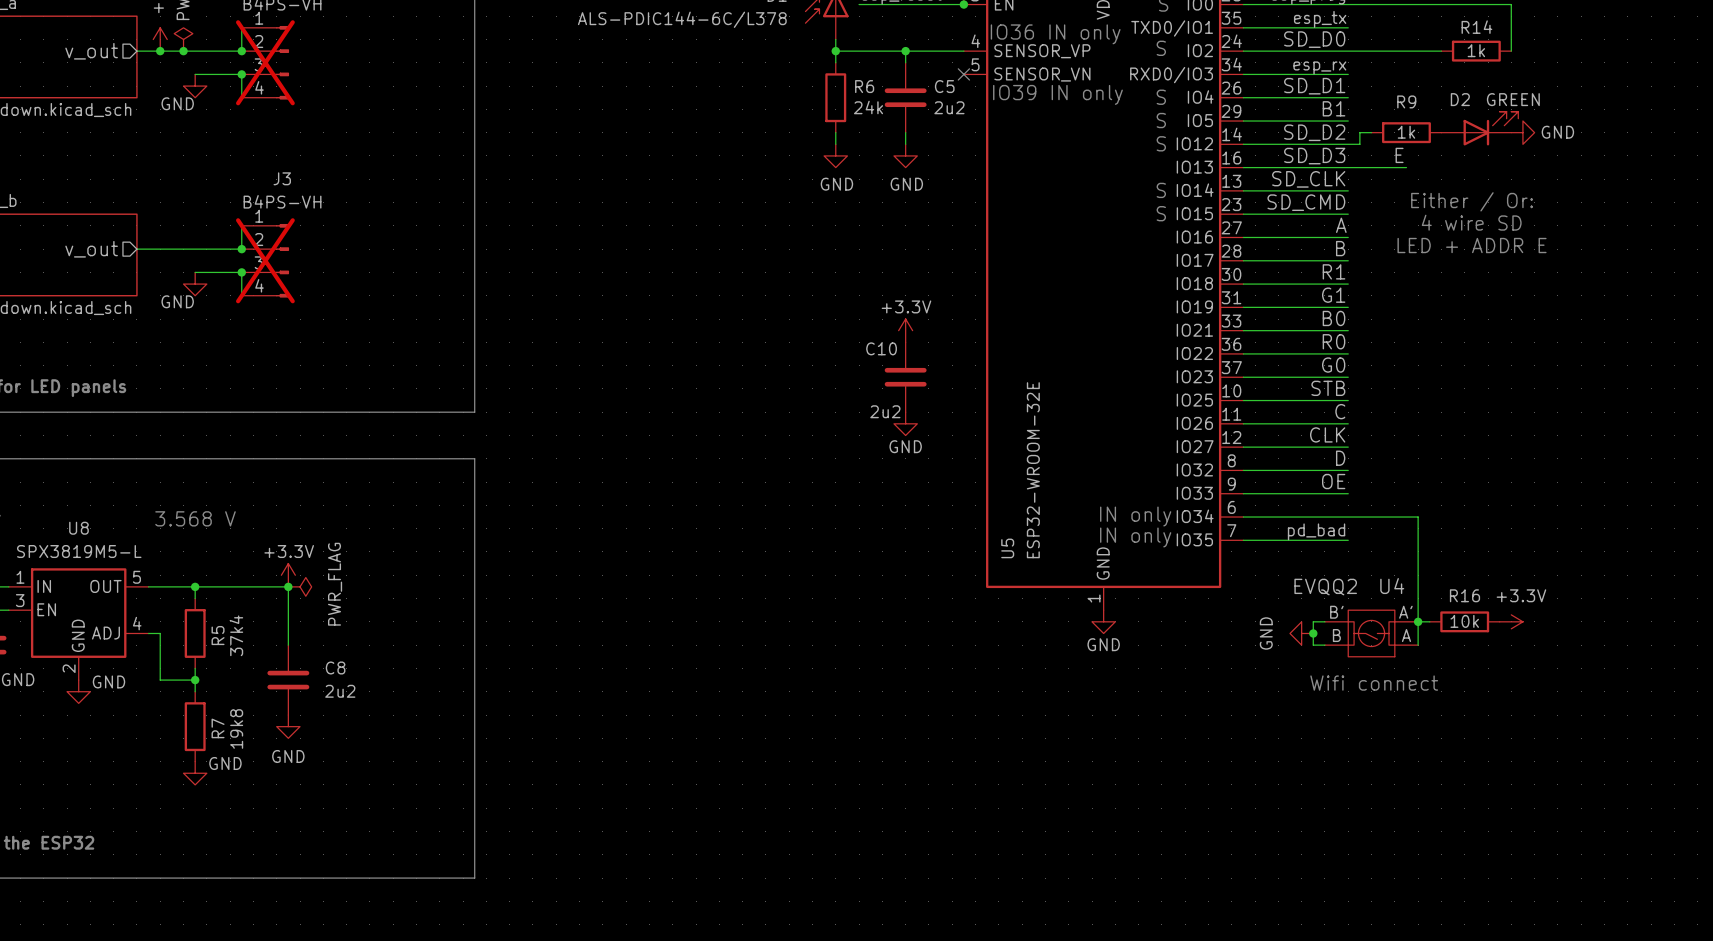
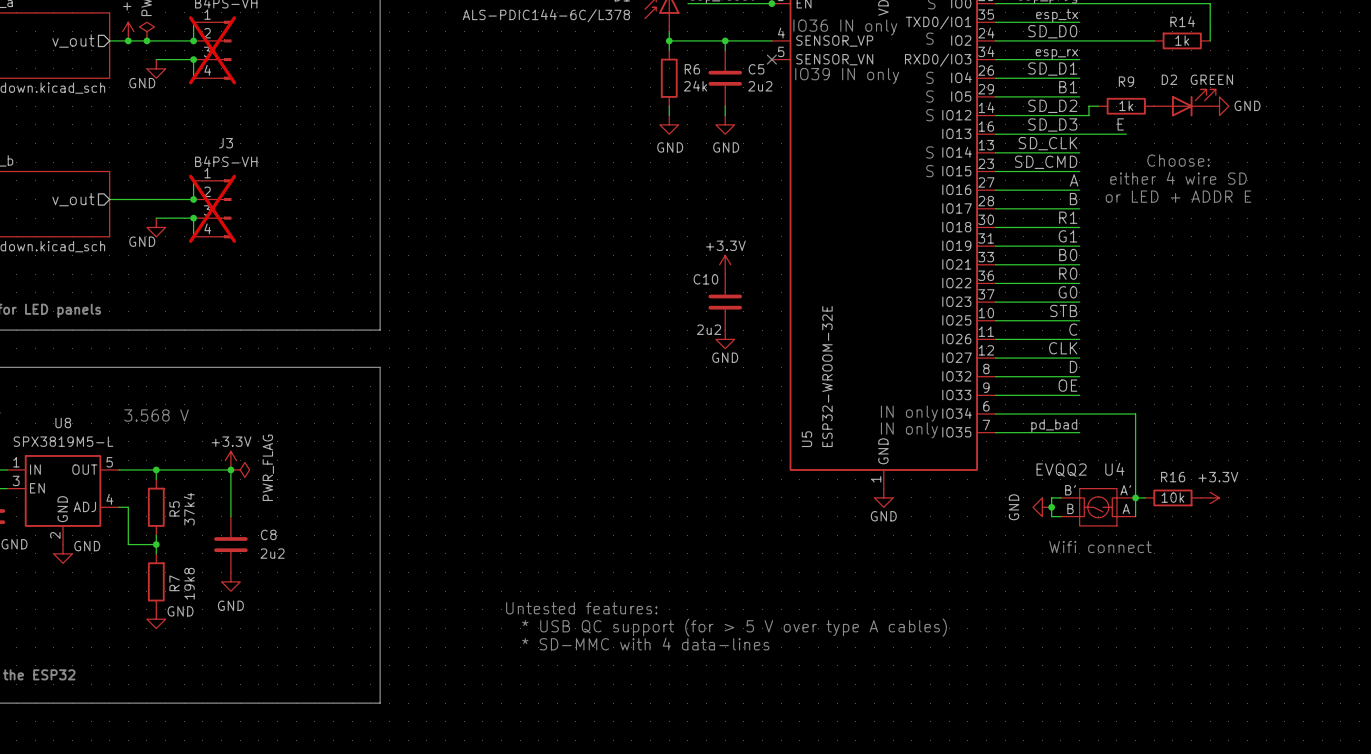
text: Either / Or: (1472, 201) -> Choose: (1178, 160)
text: 4 wire SD (1471, 222) -> either 4 wire SD (1178, 178)
text: LED + ADDR E (1472, 245) -> or LED + ADDR E (1178, 196)
text: none -> Untested features: (581, 608)
text: none -> * USB QC support (for > 5 V over type A cables) (734, 627)
text: none -> * SD-MMC with 4 data-lines (645, 644)

